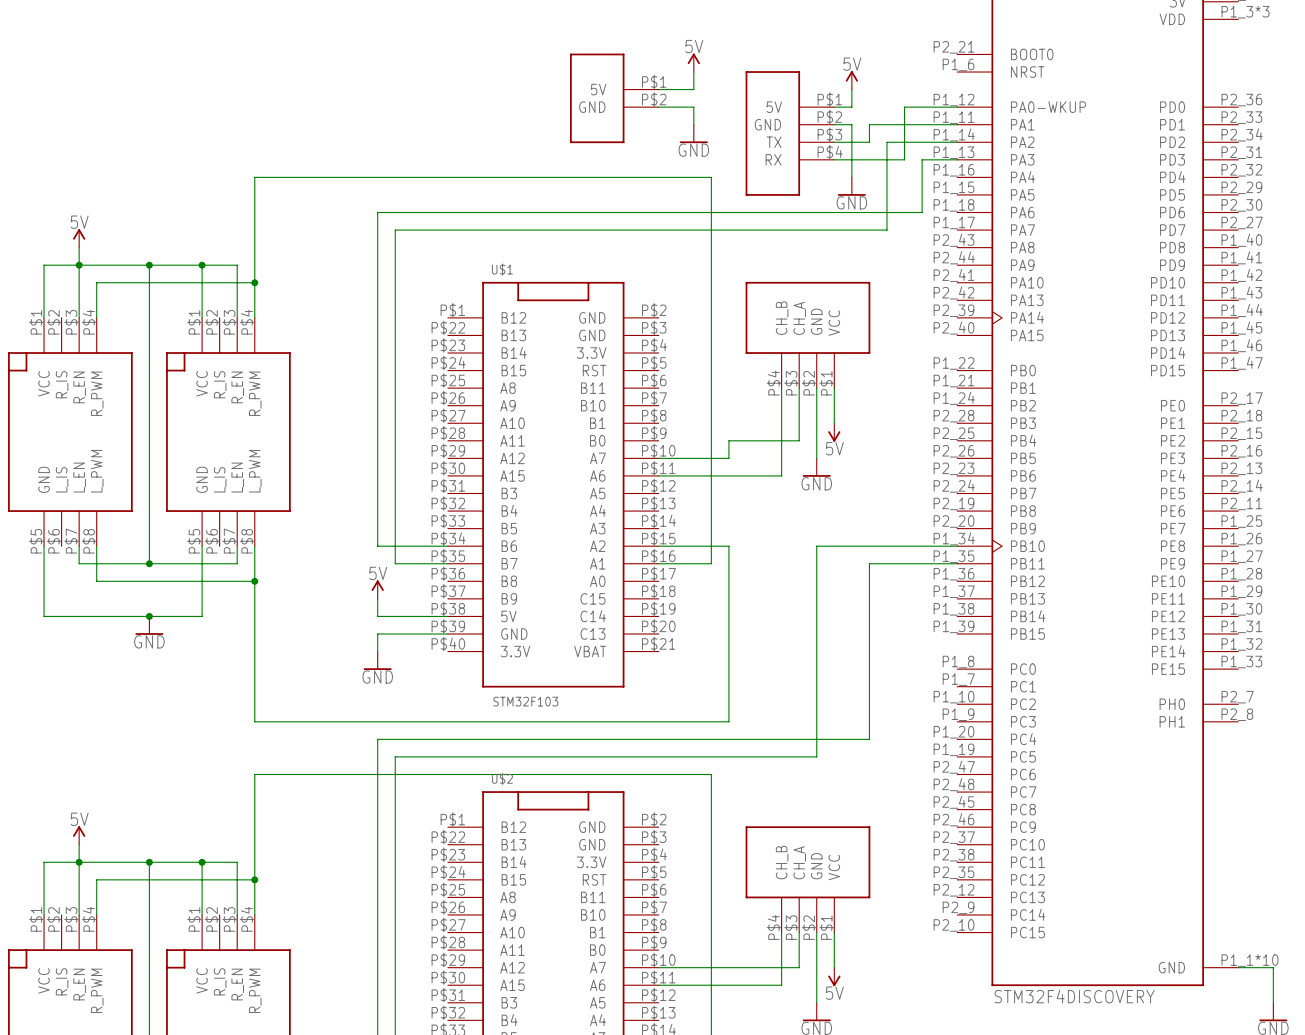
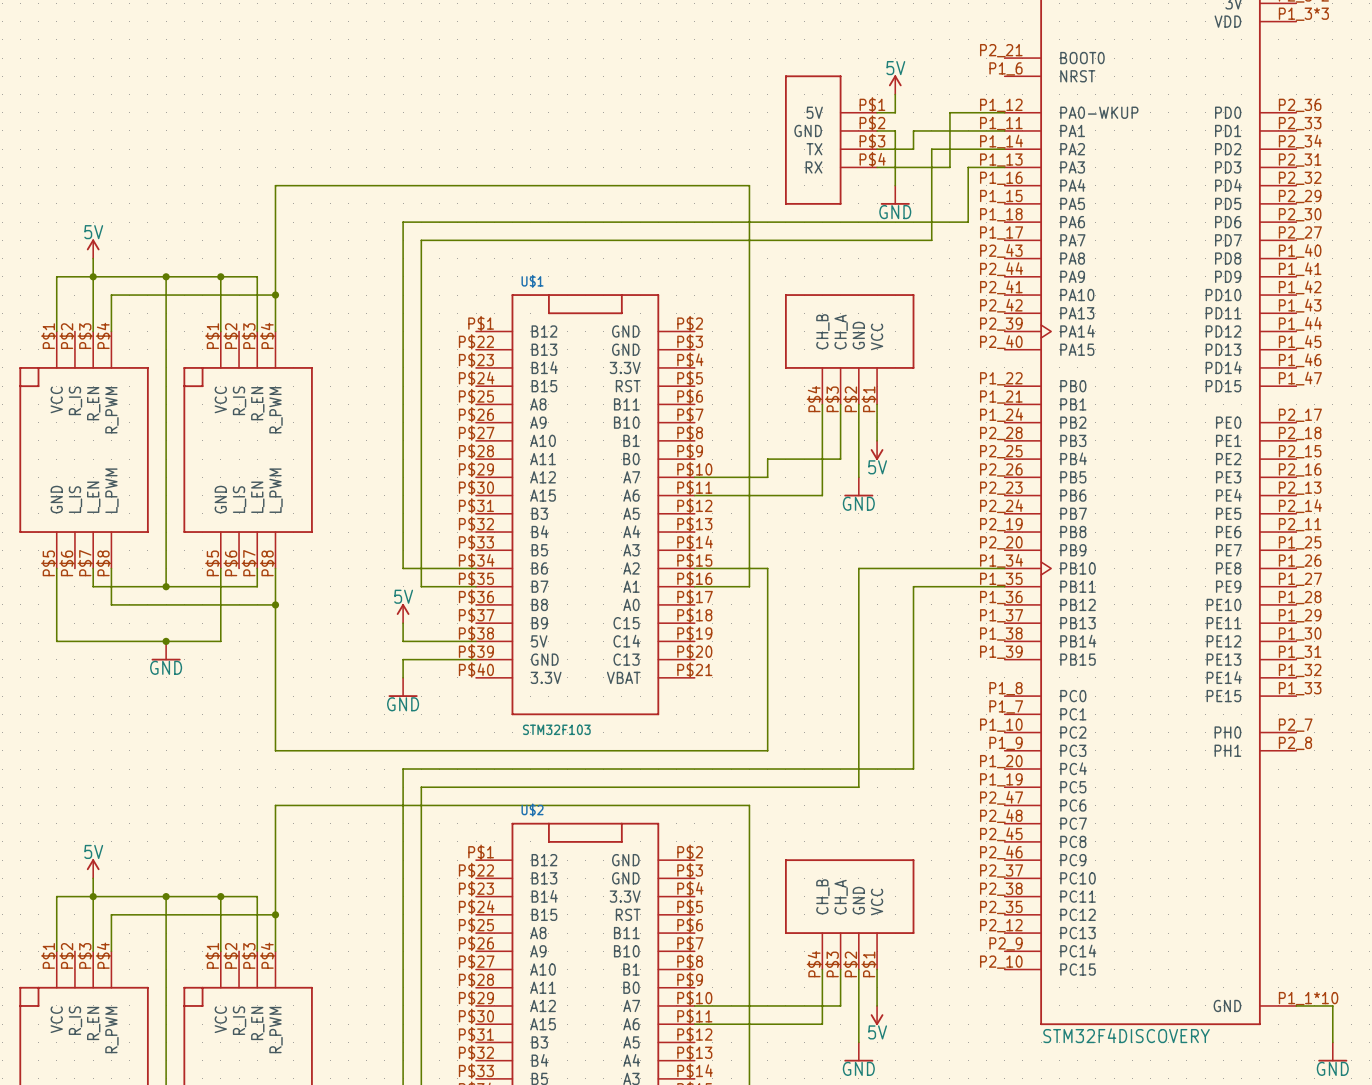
power symbol: 5V (693, 62) -> none
wire: (693, 72) (693, 89) (658, 89) -> none
part: (614, 98) -> none
wire: (658, 107) (693, 107) (693, 124) -> none
power symbol: GND (693, 133) -> none

